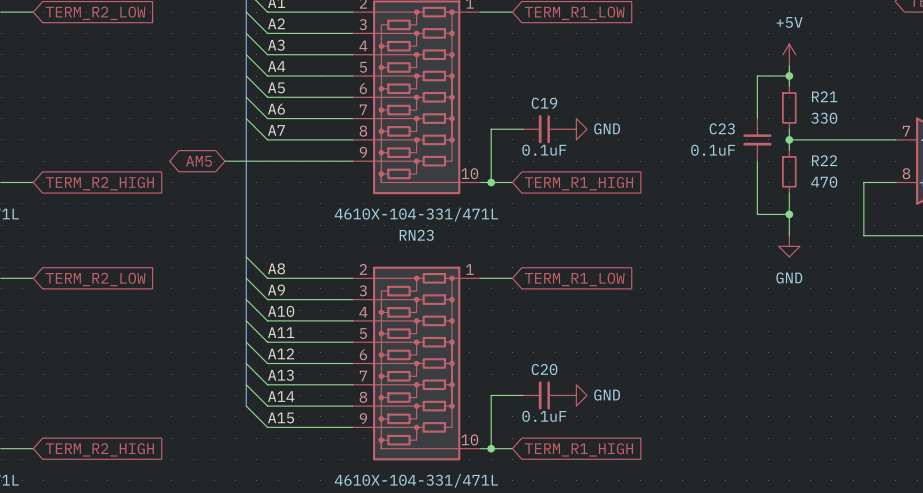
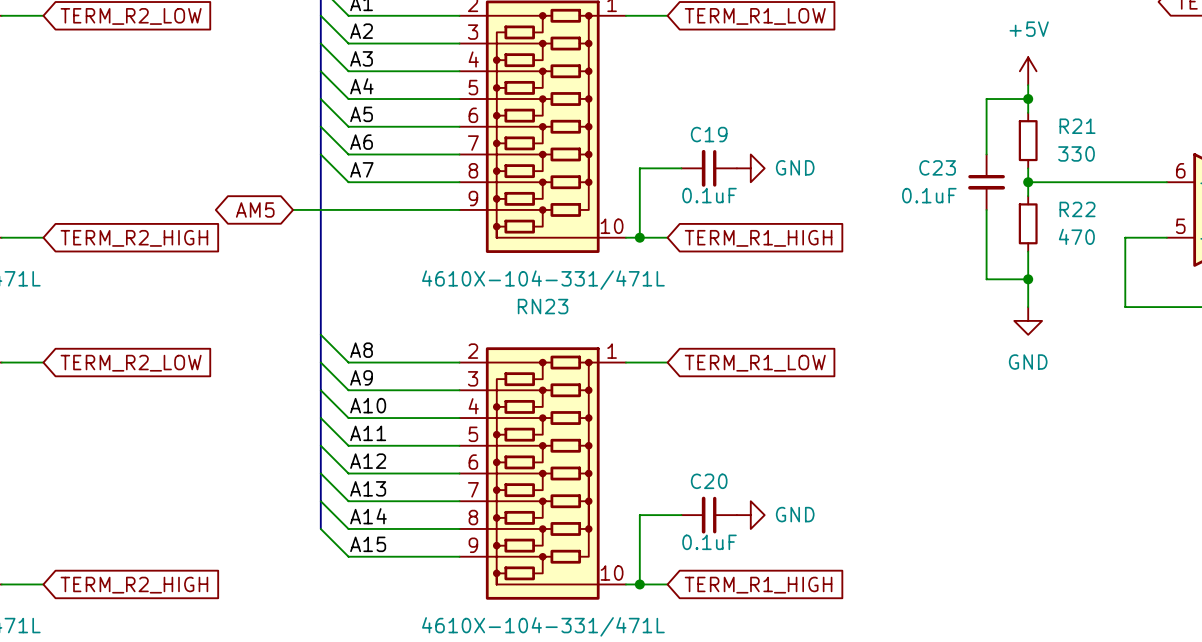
part pin number: 7 (906, 131) -> 6 (1180, 170)
part pin number: 8 (906, 173) -> 5 (1180, 226)

